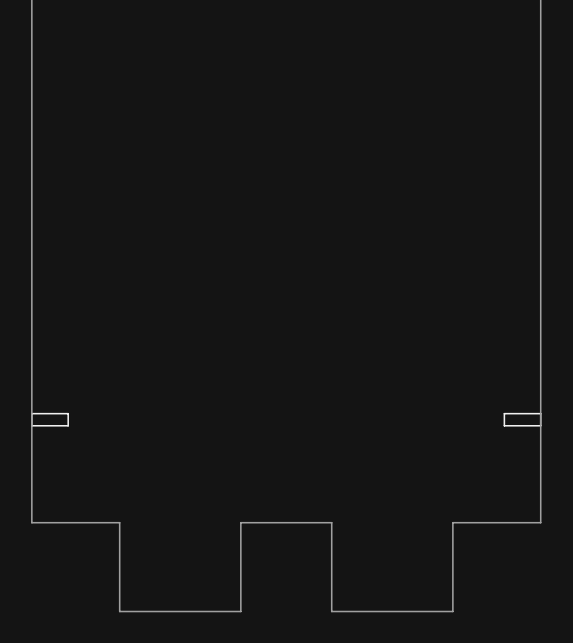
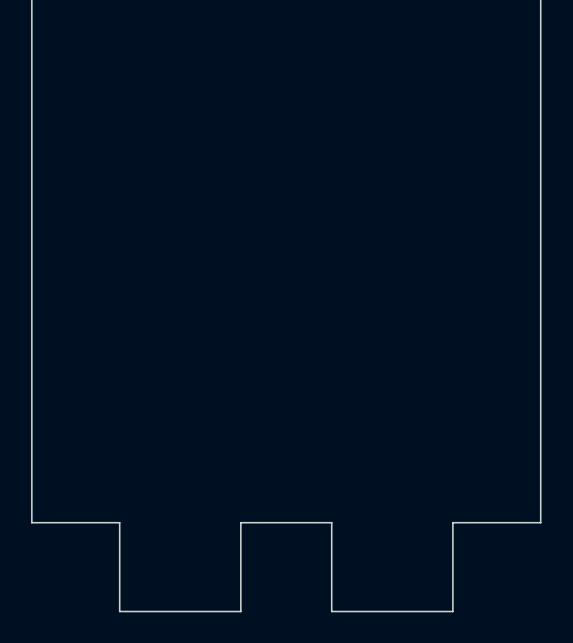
line: (68, 413) (31, 413) (31, 425) (68, 425) (68, 413) -> none
line: (540, 413) (504, 413) (504, 425) (540, 425) (540, 413) -> none

